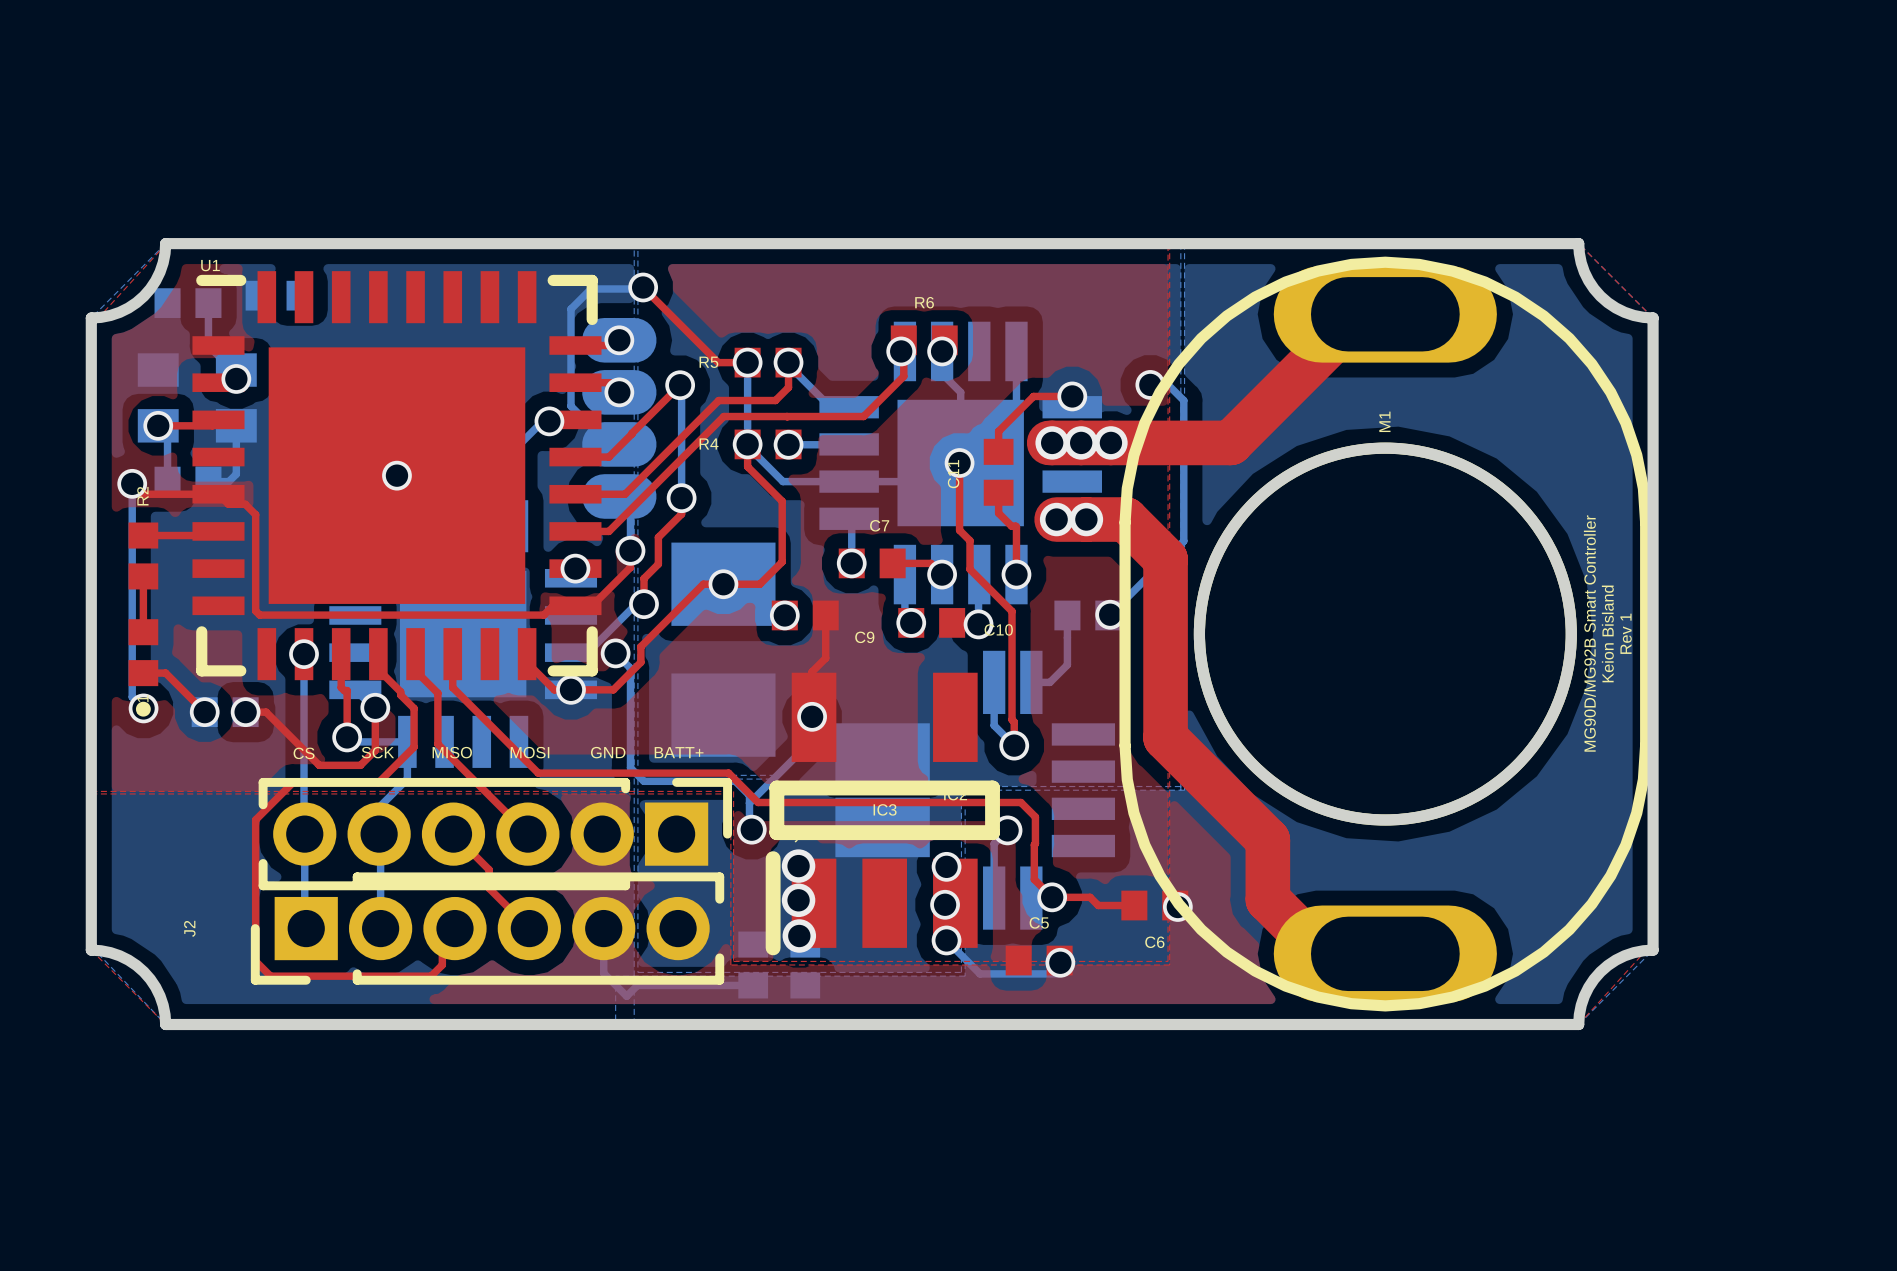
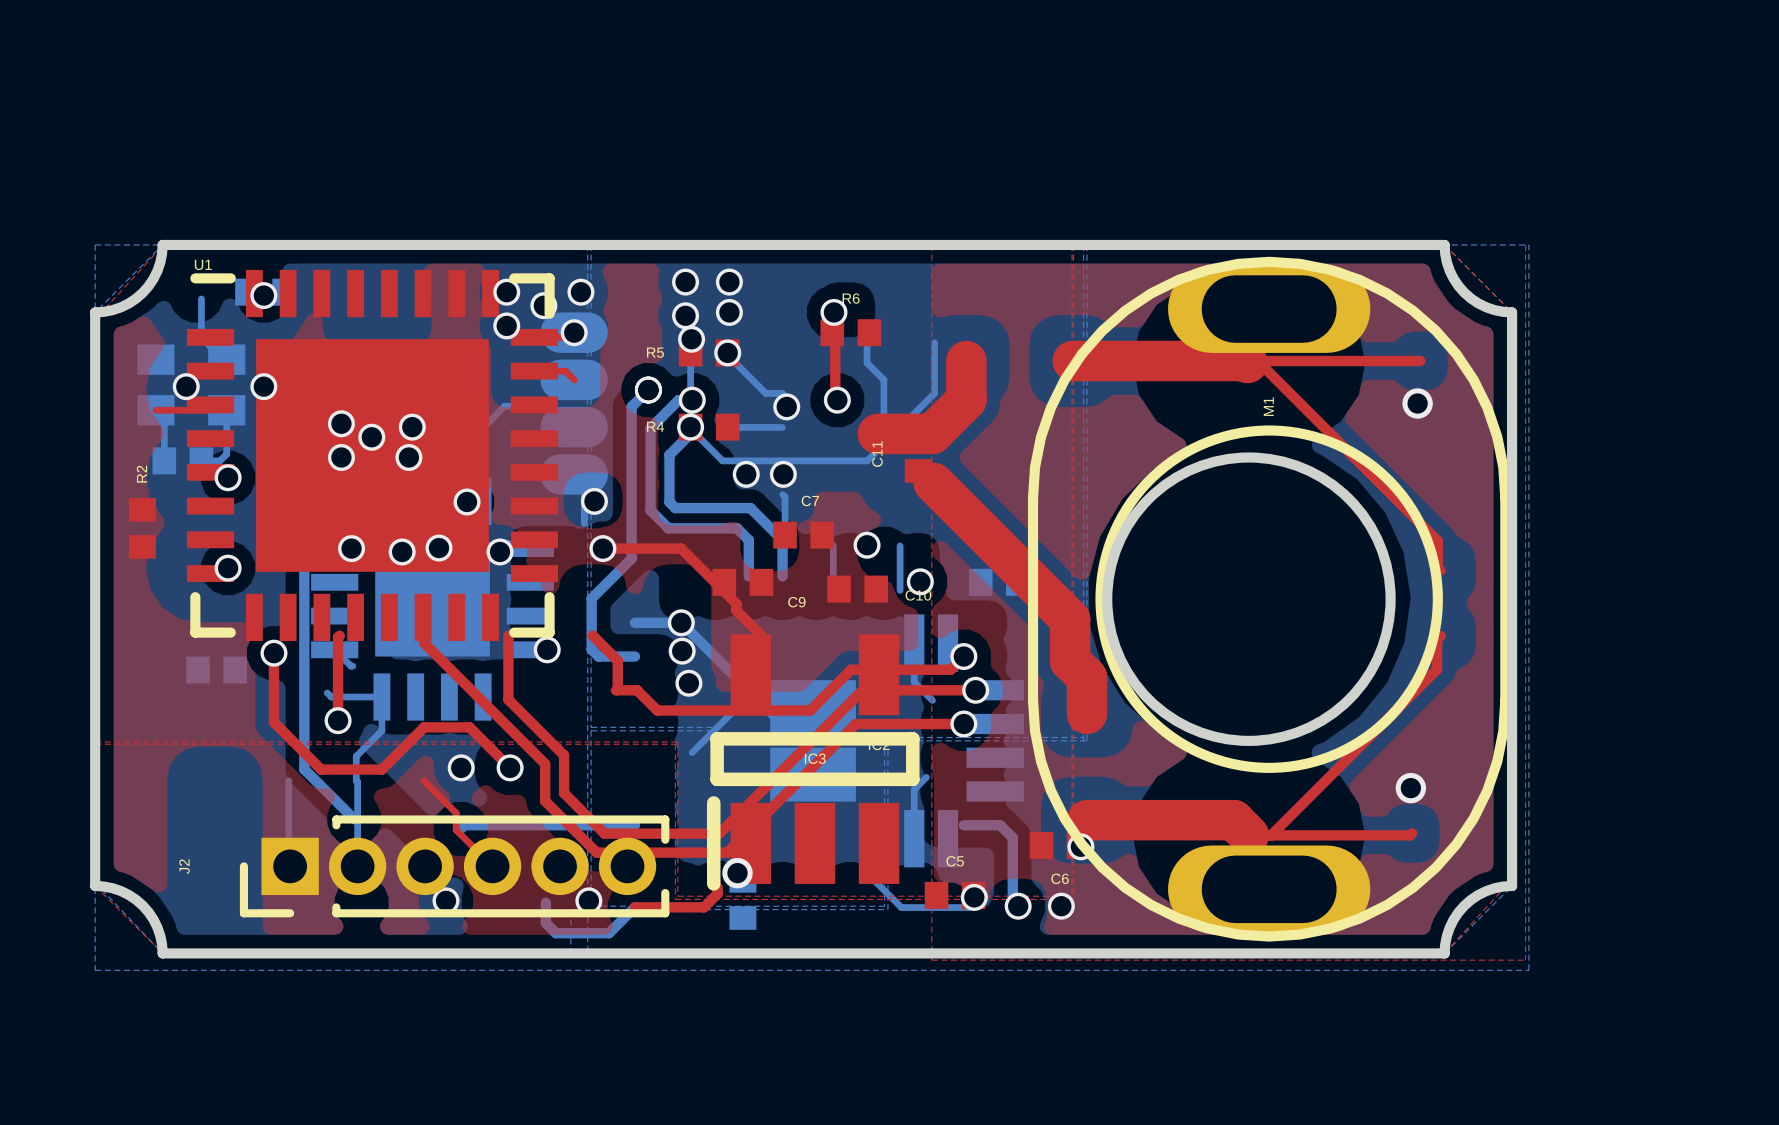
bottom zone outline: none -> (162, 244) (95, 244) (95, 970) (1528, 970) (1528, 244) (1444, 244)
top zone outline: none -> (931, 244) (931, 960) (1525, 960) (1525, 244)
via: none -> (685, 282)
via: none -> (729, 282)
bottom track: (643, 287) (591, 288) (571, 309) (571, 406) (609, 444) (619, 444) -> none
top track: (643, 287) (718, 362) (747, 362) -> none
via position: (643, 287) -> (580, 292)
via: none -> (506, 292)
via: none -> (263, 295)
part: (187, 303) -> none
via: none -> (543, 305)
top track: (1385, 314) (1359, 314) (1230, 442) (1049, 442) -> none
via: none -> (729, 312)
via: none -> (833, 312)
via: none -> (685, 315)
top track: none -> (835, 317) (835, 398) (837, 400)
via: none -> (506, 325)
top track: (903, 340) (903, 376) (863, 416) (723, 416) (608, 531) (575, 531) -> none
via: (901, 351) -> none
via: (942, 351) -> none
via position: (747, 362) -> (691, 339)
top track: (788, 362) (788, 387) (775, 400) (718, 400) (625, 494) (575, 494) -> none
top track: none -> (966, 361) (966, 399) (932, 433) (877, 433)
top track: none -> (1072, 361) (1245, 361) (1247, 363)
top track: none -> (1420, 361) (1249, 361) (1247, 363)
top track: none -> (1247, 363) (1259, 363) (1437, 541) (1437, 567) (1440, 570)
via: (236, 378) -> none
bottom track: (1150, 384) (1168, 384) (1183, 400) (1183, 541) (1110, 614) -> none
via: (1150, 384) -> none
bottom track: (680, 385) (681, 498) -> none
top track: (680, 385) (631, 433) -> none
via position: (680, 385) -> (648, 390)
via: (619, 392) -> none
top track: (1072, 396) (1033, 396) (998, 431) (998, 451) -> none
via: (1072, 396) -> none
via: none -> (186, 386)
via: none -> (263, 386)
bottom track: none -> (648, 390) (631, 406) (631, 558) (591, 598) (591, 649) (598, 656) (634, 656)
bottom track: none -> (692, 400) (678, 400) (650, 428) (650, 510) (668, 528) (736, 528) (748, 540) (748, 576)
via: none -> (692, 400)
via: none -> (837, 400)
via: none -> (1417, 403)
via: (549, 421) -> none
via: none -> (786, 406)
via: (158, 425) -> none
top track: (631, 434) (608, 457) (575, 457) -> none
via: none -> (341, 423)
via: (1052, 442) -> none
via: (1081, 442) -> none
via: (1110, 442) -> none
round board edge size: [1193, 442, 1577, 826] -> [1102, 452, 1396, 746]
via: none -> (412, 427)
top track: (747, 444) (747, 466) (782, 501) (782, 561) (759, 584) (703, 584) (640, 646) (640, 662) (613, 689) (554, 689) (528, 663) -> none
via: (788, 444) -> none
bottom track: none -> (690, 433) (669, 454) (669, 502) (675, 508) (750, 508) (782, 540) (782, 576)
top track: (959, 463) (959, 530) (969, 540) (969, 569) (1012, 611) (1012, 719) (1014, 721) (1014, 745) -> none
via: (959, 463) -> none
part: (960, 463) -> none
via position: (396, 475) -> (371, 437)
via: none -> (341, 457)
via: none -> (408, 457)
bottom track: (132, 483) (132, 697) (143, 708) -> none
top track: (132, 483) (142, 494) (218, 494) (228, 504) (245, 504) (255, 514) (255, 611) (259, 615) (543, 615) (553, 605) (592, 605) (630, 567) (630, 550) -> none
via: (132, 483) -> none
top track: (998, 492) (998, 513) (1011, 526) (1015, 526) -> none
via: none -> (746, 474)
via: none -> (783, 474)
top track: (681, 498) (681, 514) (658, 537) (658, 564) (644, 578) (644, 604) -> none
via: (681, 498) -> none
via: none -> (228, 477)
top track: none -> (933, 482) (1070, 619) (1070, 660) (1087, 677) (1087, 713)
top track: (1056, 519) (1125, 519) (1165, 559) (1165, 737) (1267, 840) (1267, 899) (1322, 953) (1385, 953) -> none
via: (1056, 519) -> none
via: (1086, 519) -> none
bottom track: none -> (398, 501) (341, 501) (304, 538) (304, 769) (354, 819)
via: none -> (467, 502)
via: none -> (594, 501)
top track: (1016, 526) (1016, 574) -> none
top track: (218, 531) (214, 535) (143, 535) -> none
via: (630, 550) -> none
via: (851, 563) -> none
top track: (892, 563) (930, 563) (942, 574) -> none
via: (575, 568) -> none
via: (1016, 574) -> none
top track: (143, 576) (143, 632) -> none
via: none -> (439, 548)
via: none -> (351, 548)
top track: none -> (602, 548) (681, 548) (736, 603) (736, 610) (761, 635)
via: none -> (602, 548)
via: none -> (402, 551)
via: none -> (500, 551)
via: (723, 584) -> none
via: none -> (228, 568)
bottom track: (644, 604) (636, 604) (587, 652) (571, 652) -> none
via: (644, 604) -> none
via: (1110, 614) -> none
via: (784, 615) -> none
top track: (825, 615) (825, 658) (812, 671) (812, 716) -> none
bottom track: (1067, 615) (1067, 664) (1049, 682) (1031, 682) -> none
via: (911, 622) -> none
via position: (978, 624) -> (920, 581)
text: MG90D/MG92B Smart Controller (1589, 633) -> none
text: Keion Bisland (1607, 633) -> none
text: Rev 1 (1626, 633) -> none
part: (723, 649) -> none
bottom track: (615, 653) (630, 668) (630, 767) (643, 781) (735, 781) (749, 795) (749, 827) (751, 829) -> none
via: (615, 653) -> none
bottom track: (304, 654) (304, 833) -> none
via: (304, 654) -> none
top track: (341, 654) (341, 687) (347, 690) (347, 737) -> none
top track: (378, 654) (378, 669) (414, 708) (414, 747) (378, 782) (292, 782) (255, 819) (255, 961) (270, 976) (431, 976) (442, 965) (442, 941) (454, 928) -> none
top track: (415, 654) (415, 670) (437, 693) (437, 744) (527, 834) -> none
top track: (452, 654) (452, 687) (538, 773) (728, 773) (758, 802) (1020, 802) (1035, 817) (1034, 879) (1052, 897) (1090, 897) (1098, 905) (1134, 905) -> none
bottom track: none -> (634, 622) (681, 622) (799, 740)
via: none -> (681, 622)
part: (143, 667) -> none
top track: (143, 673) (165, 673) (204, 712) -> none
top track: none -> (339, 635) (338, 637) (338, 720)
top track: none -> (424, 635) (424, 642) (545, 763) (545, 801) (596, 852) (727, 852) (855, 724) (963, 724)
top track: none -> (508, 635) (508, 699) (564, 755) (564, 793) (604, 833) (719, 833) (862, 690) (975, 690)
top track: none -> (592, 635) (617, 660) (616, 690) (637, 690) (657, 710) (810, 710) (851, 669) (950, 669) (963, 656)
top track: none -> (1440, 635) (1437, 639) (1437, 669) (1271, 835)
via position: (571, 689) -> (547, 649)
via: none -> (682, 651)
top track: none -> (273, 653) (273, 722) (321, 769) (381, 769) (424, 727) (469, 727) (510, 767)
via: none -> (273, 653)
via: none -> (963, 656)
top track: (375, 707) (375, 750) (360, 765) (319, 765) (266, 712) (245, 712) -> none
via: (375, 707) -> none
via: (143, 708) -> none
via: (204, 712) -> none
via: (245, 712) -> none
via: (812, 716) -> none
via: none -> (688, 683)
via: none -> (975, 690)
via: (347, 737) -> none
via: (1014, 745) -> none
text: SCK (377, 752) -> none
text: MISO (452, 752) -> none
text: MOSI (530, 752) -> none
text: GND (608, 752) -> none
text: BATT+ (679, 752) -> none
text: CS (304, 753) -> none
via: none -> (338, 720)
via: none -> (963, 724)
via: none -> (461, 767)
via: none -> (510, 767)
via: (751, 829) -> none
via: (1007, 830) -> none
part: (495, 834) -> none
via: none -> (1410, 788)
via: (798, 866) -> none
via: (946, 866) -> none
top track: none -> (1087, 820) (1233, 820) (1248, 835) (1410, 835) (1412, 833)
bottom track: none -> (634, 825) (464, 825) (460, 828)
bottom track: none -> (963, 825) (1000, 825) (1012, 837) (1012, 900) (1018, 906)
via: (1052, 897) -> none
via: (798, 900) -> none
via: (945, 904) -> none
bottom track: (603, 928) (603, 973) (626, 996) (637, 985) (753, 985) -> none
via: (946, 940) -> none
top track: none -> (717, 887) (717, 893) (704, 907) (634, 907)
part: (753, 965) -> none
via: none -> (446, 900)
via: none -> (588, 900)
bottom track: none -> (545, 902) (545, 923) (556, 933) (609, 933) (634, 907)
via: none -> (1018, 906)
via: none -> (1061, 906)

